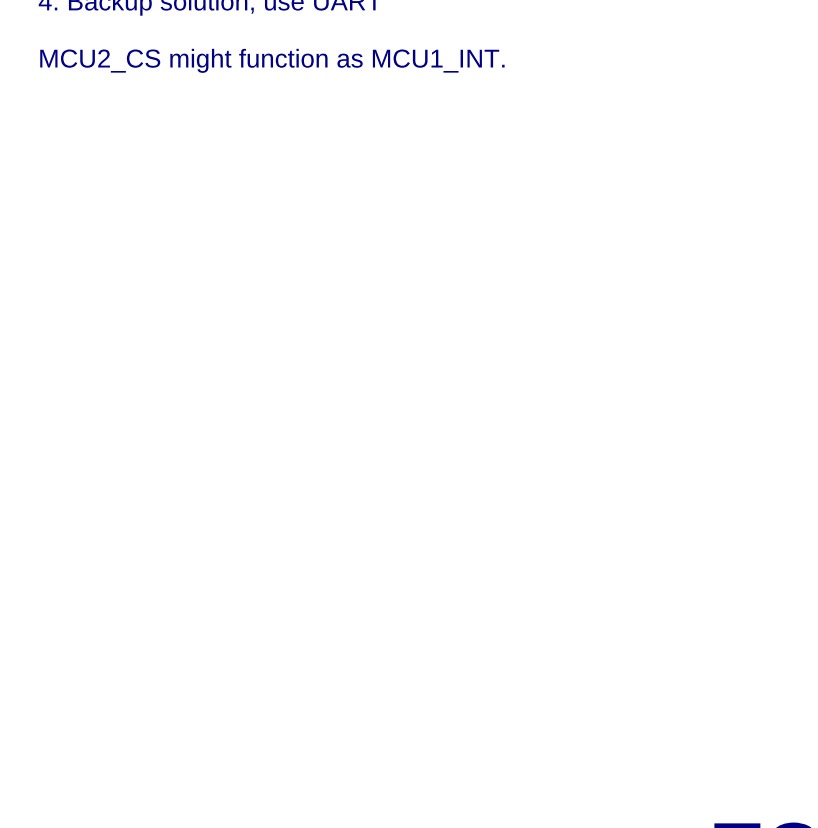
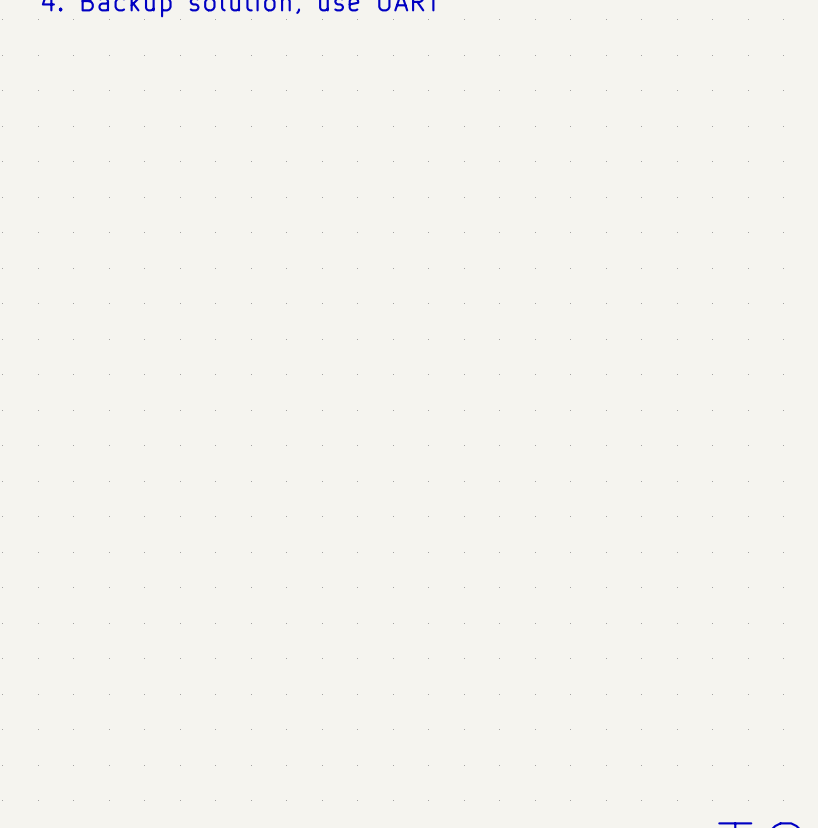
text: MCU2_CS might function as MCU1_INT. (272, 60) -> none

